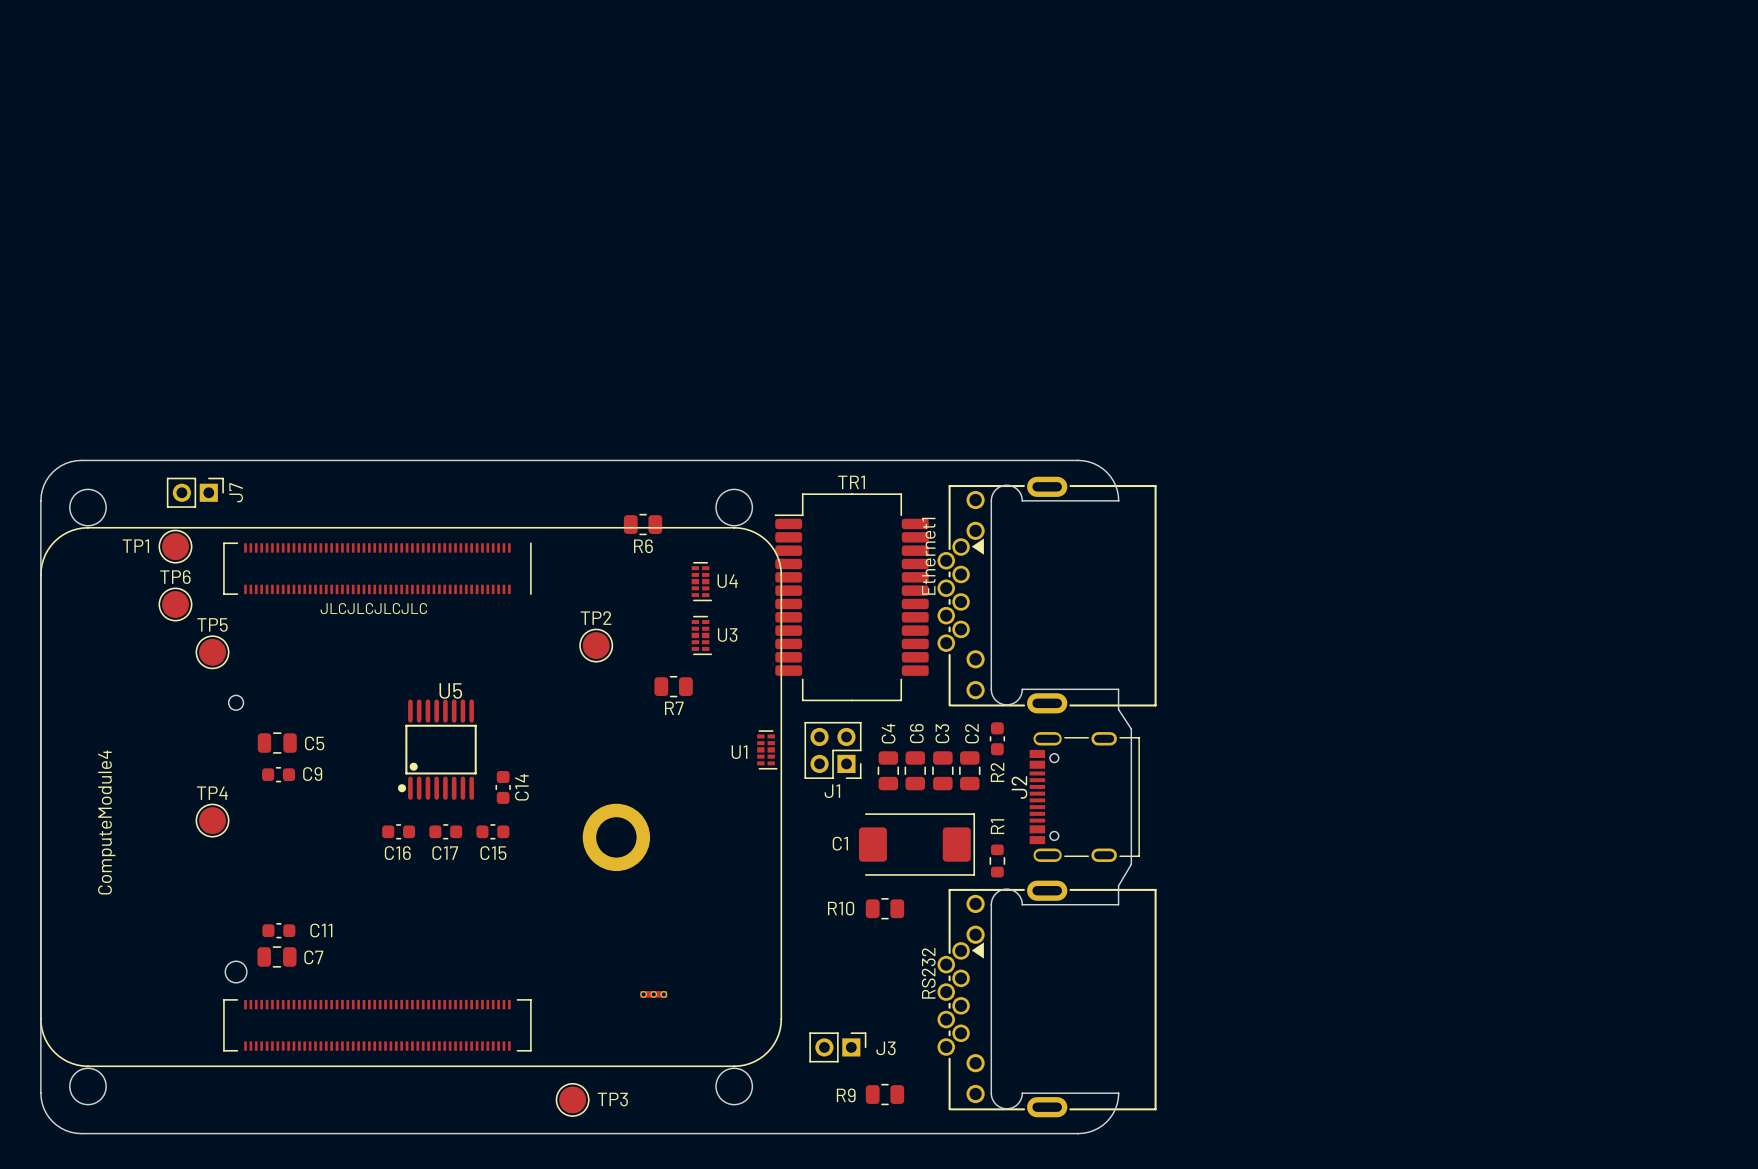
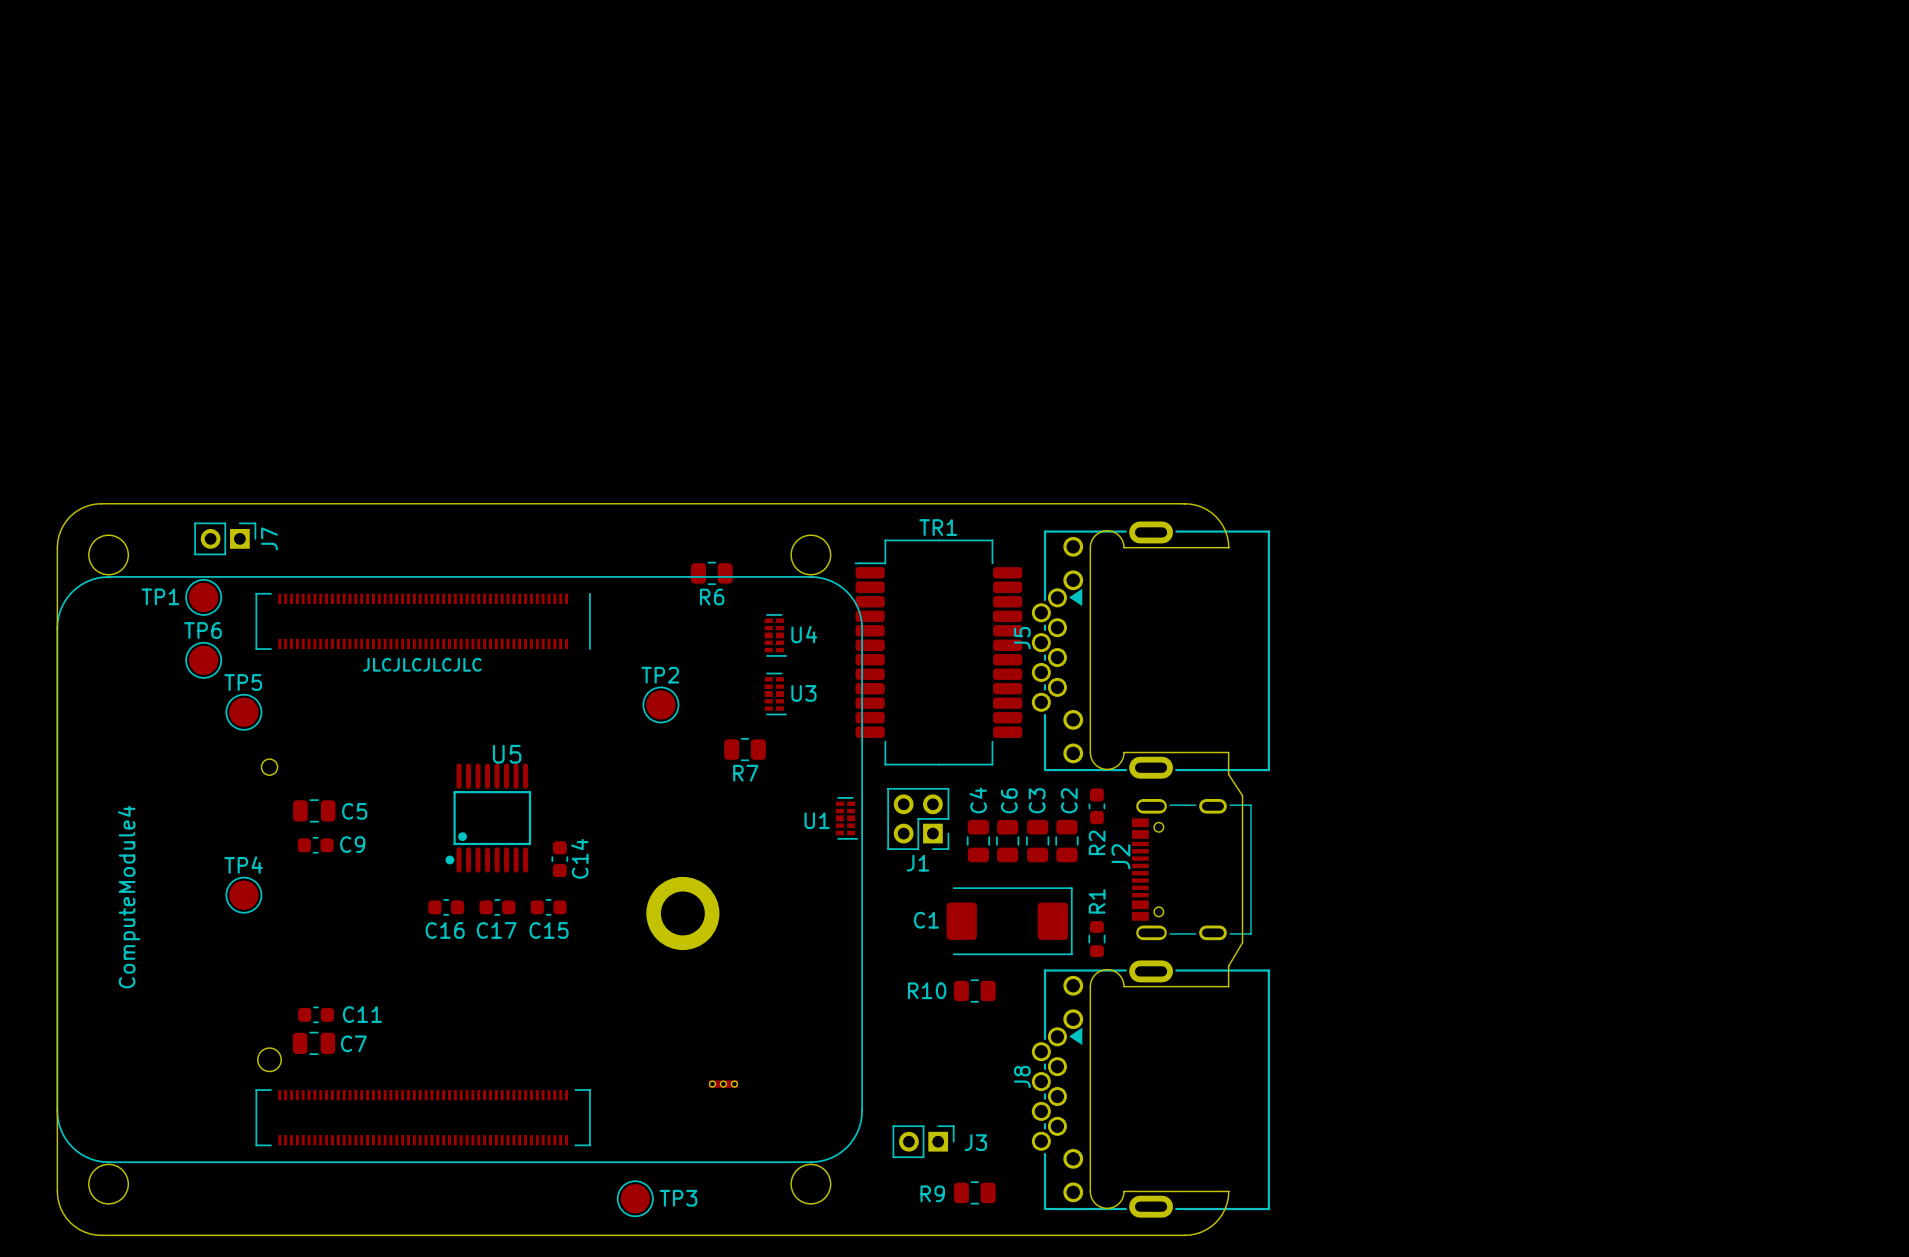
Ethernet1 name: Ethernet1 (928, 556) -> J5 (1022, 638)
RS232 name: RS232 (928, 973) -> J8 (1022, 1077)

